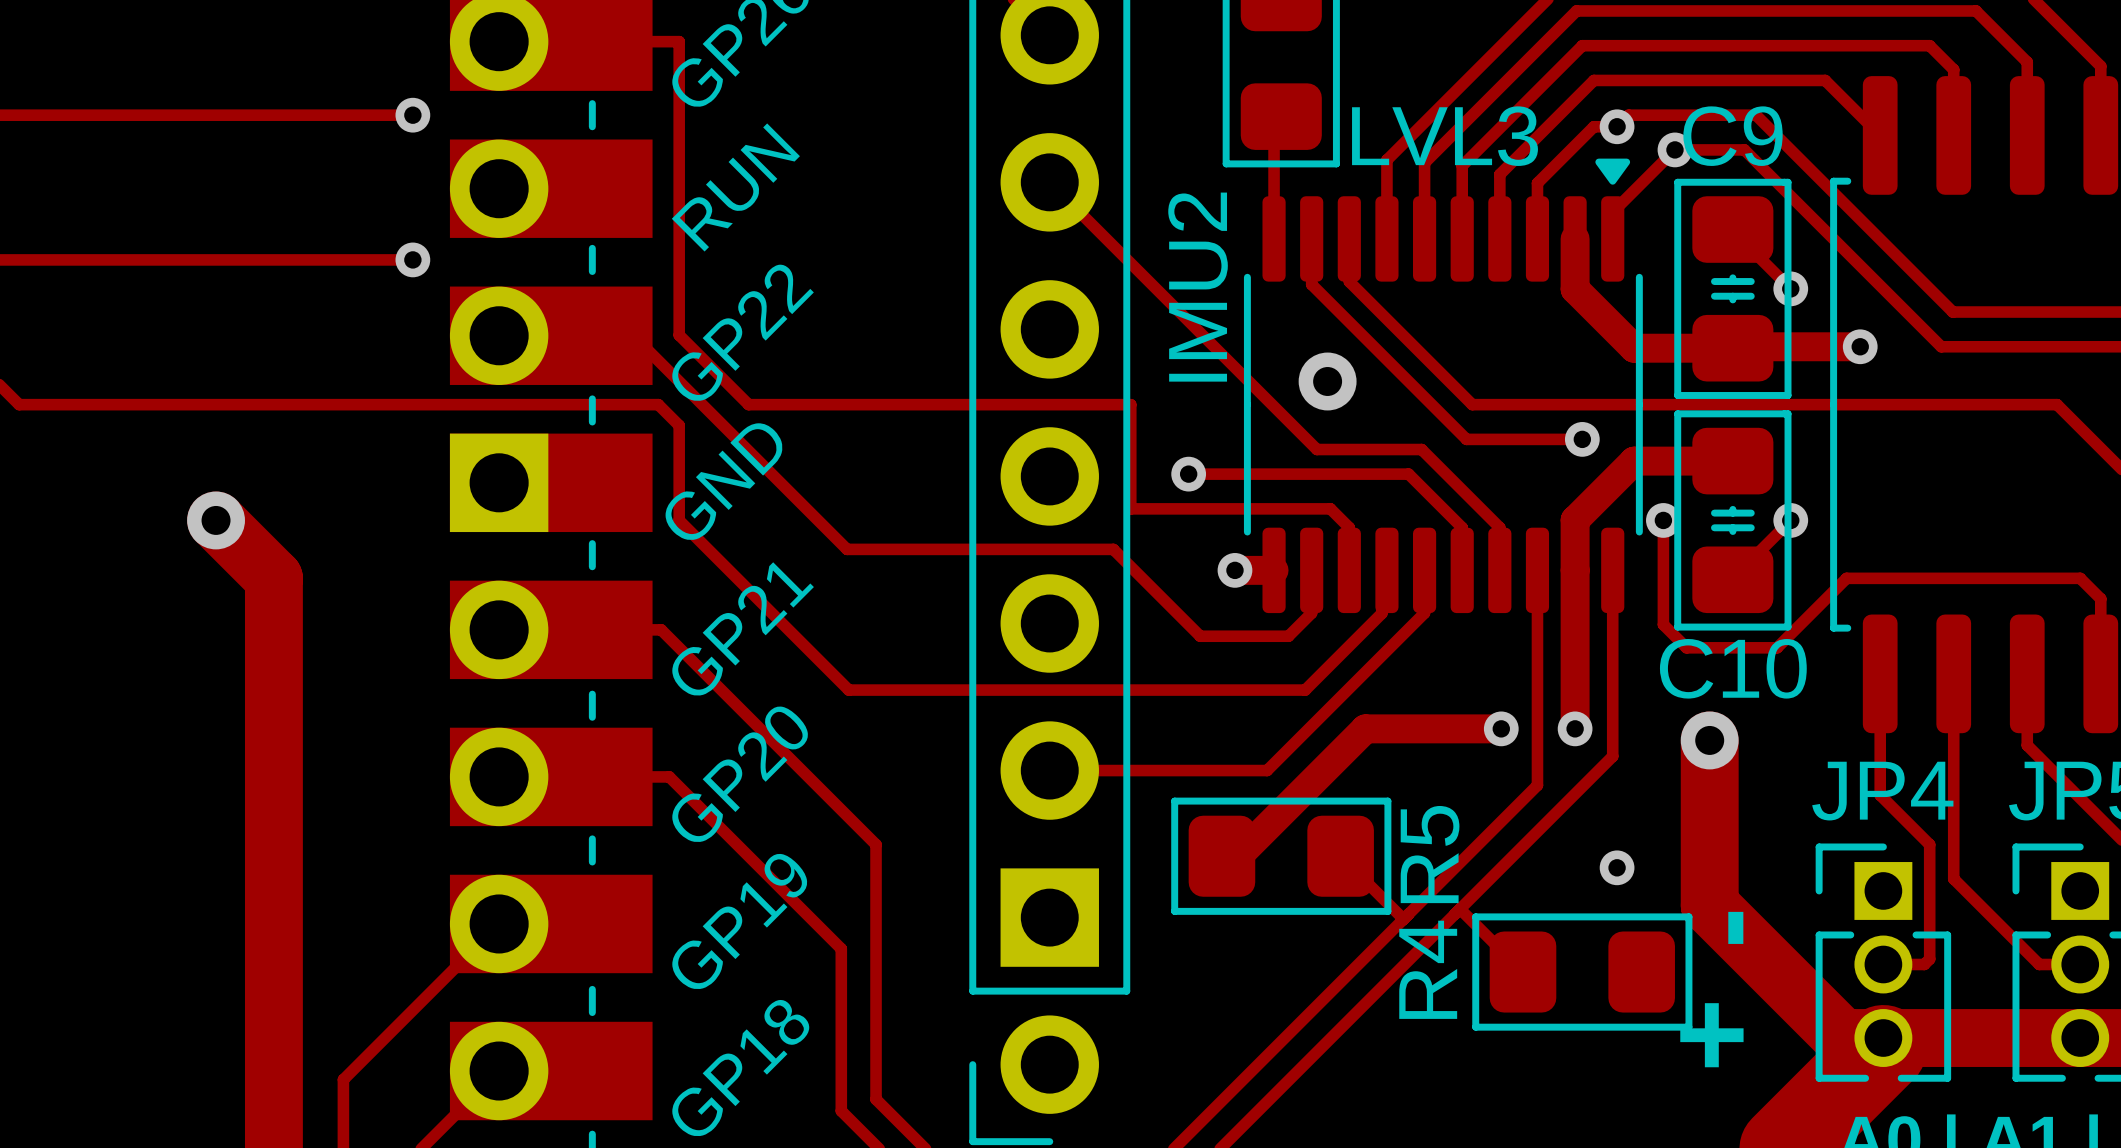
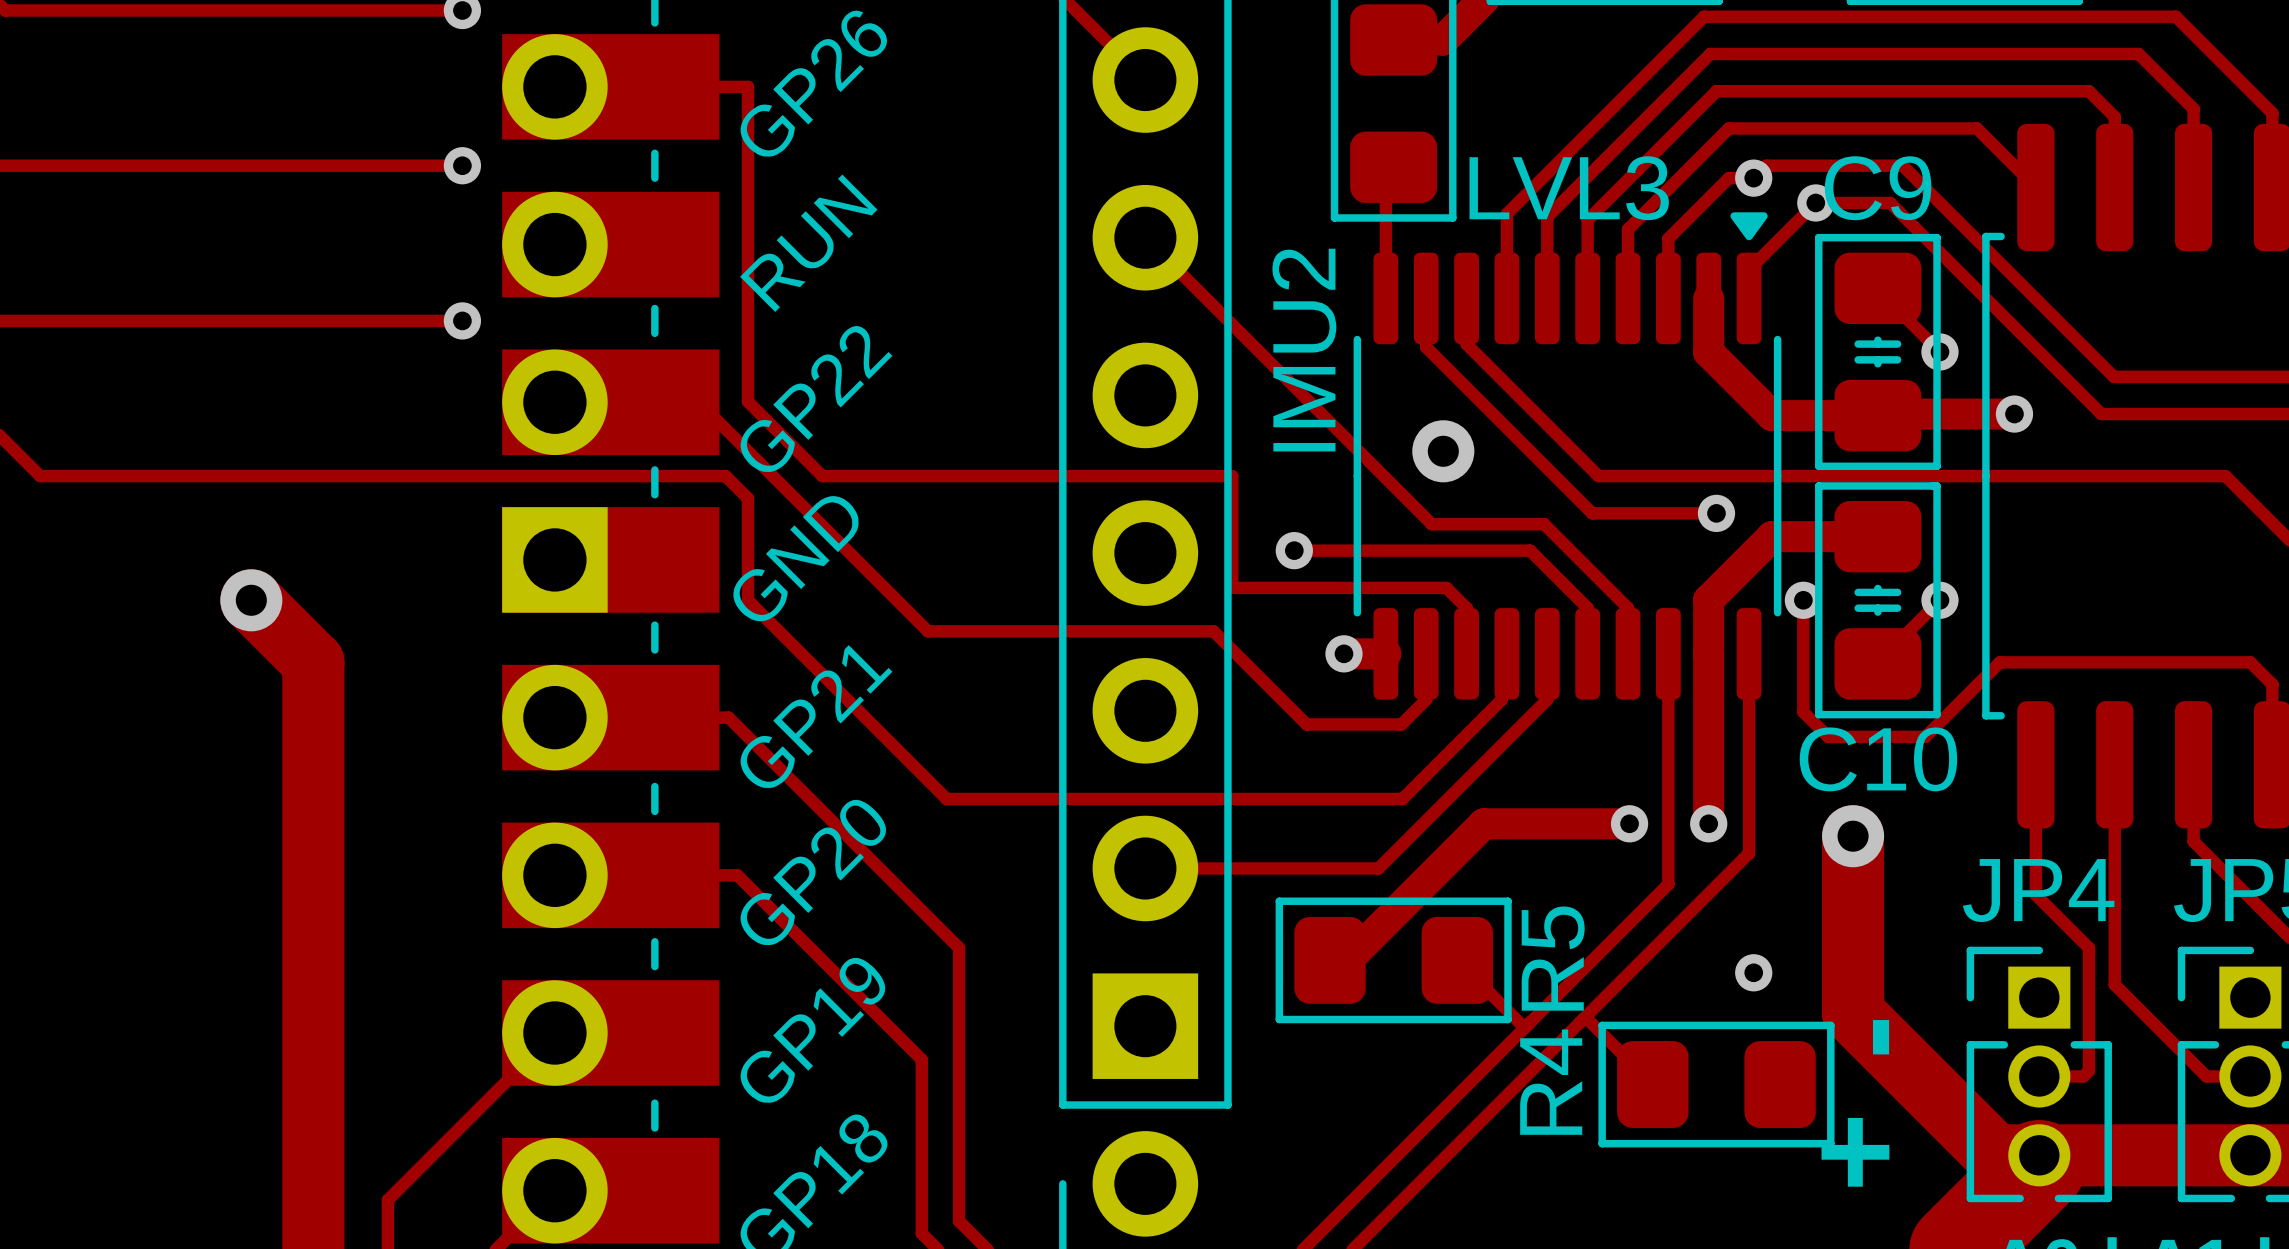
track: (848, 690) (1305, 690) -> (929, 782) (946, 798) (1402, 798) (1419, 782)

